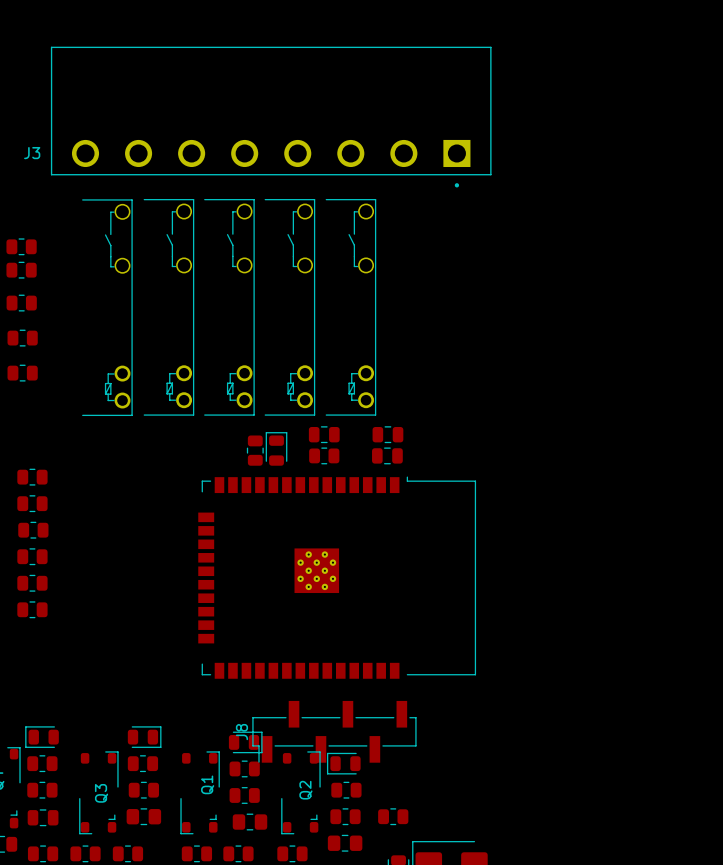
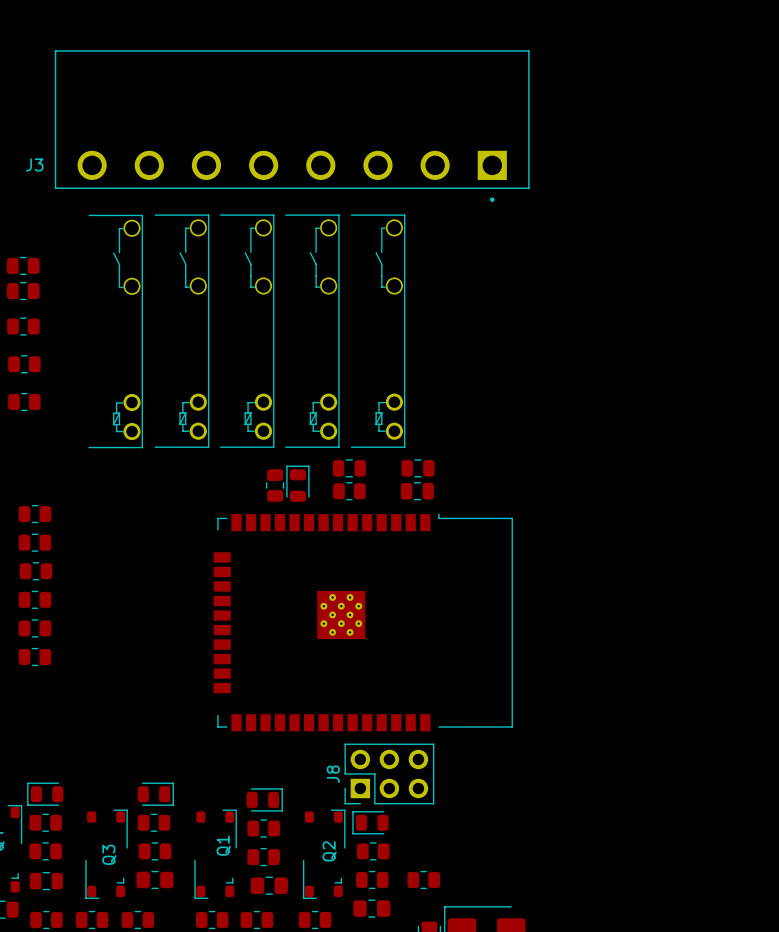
J8 footprint: [252, 700, 417, 763] -> [344, 743, 435, 805]
J8 name position: J8 (241, 732) -> J8 (333, 774)

